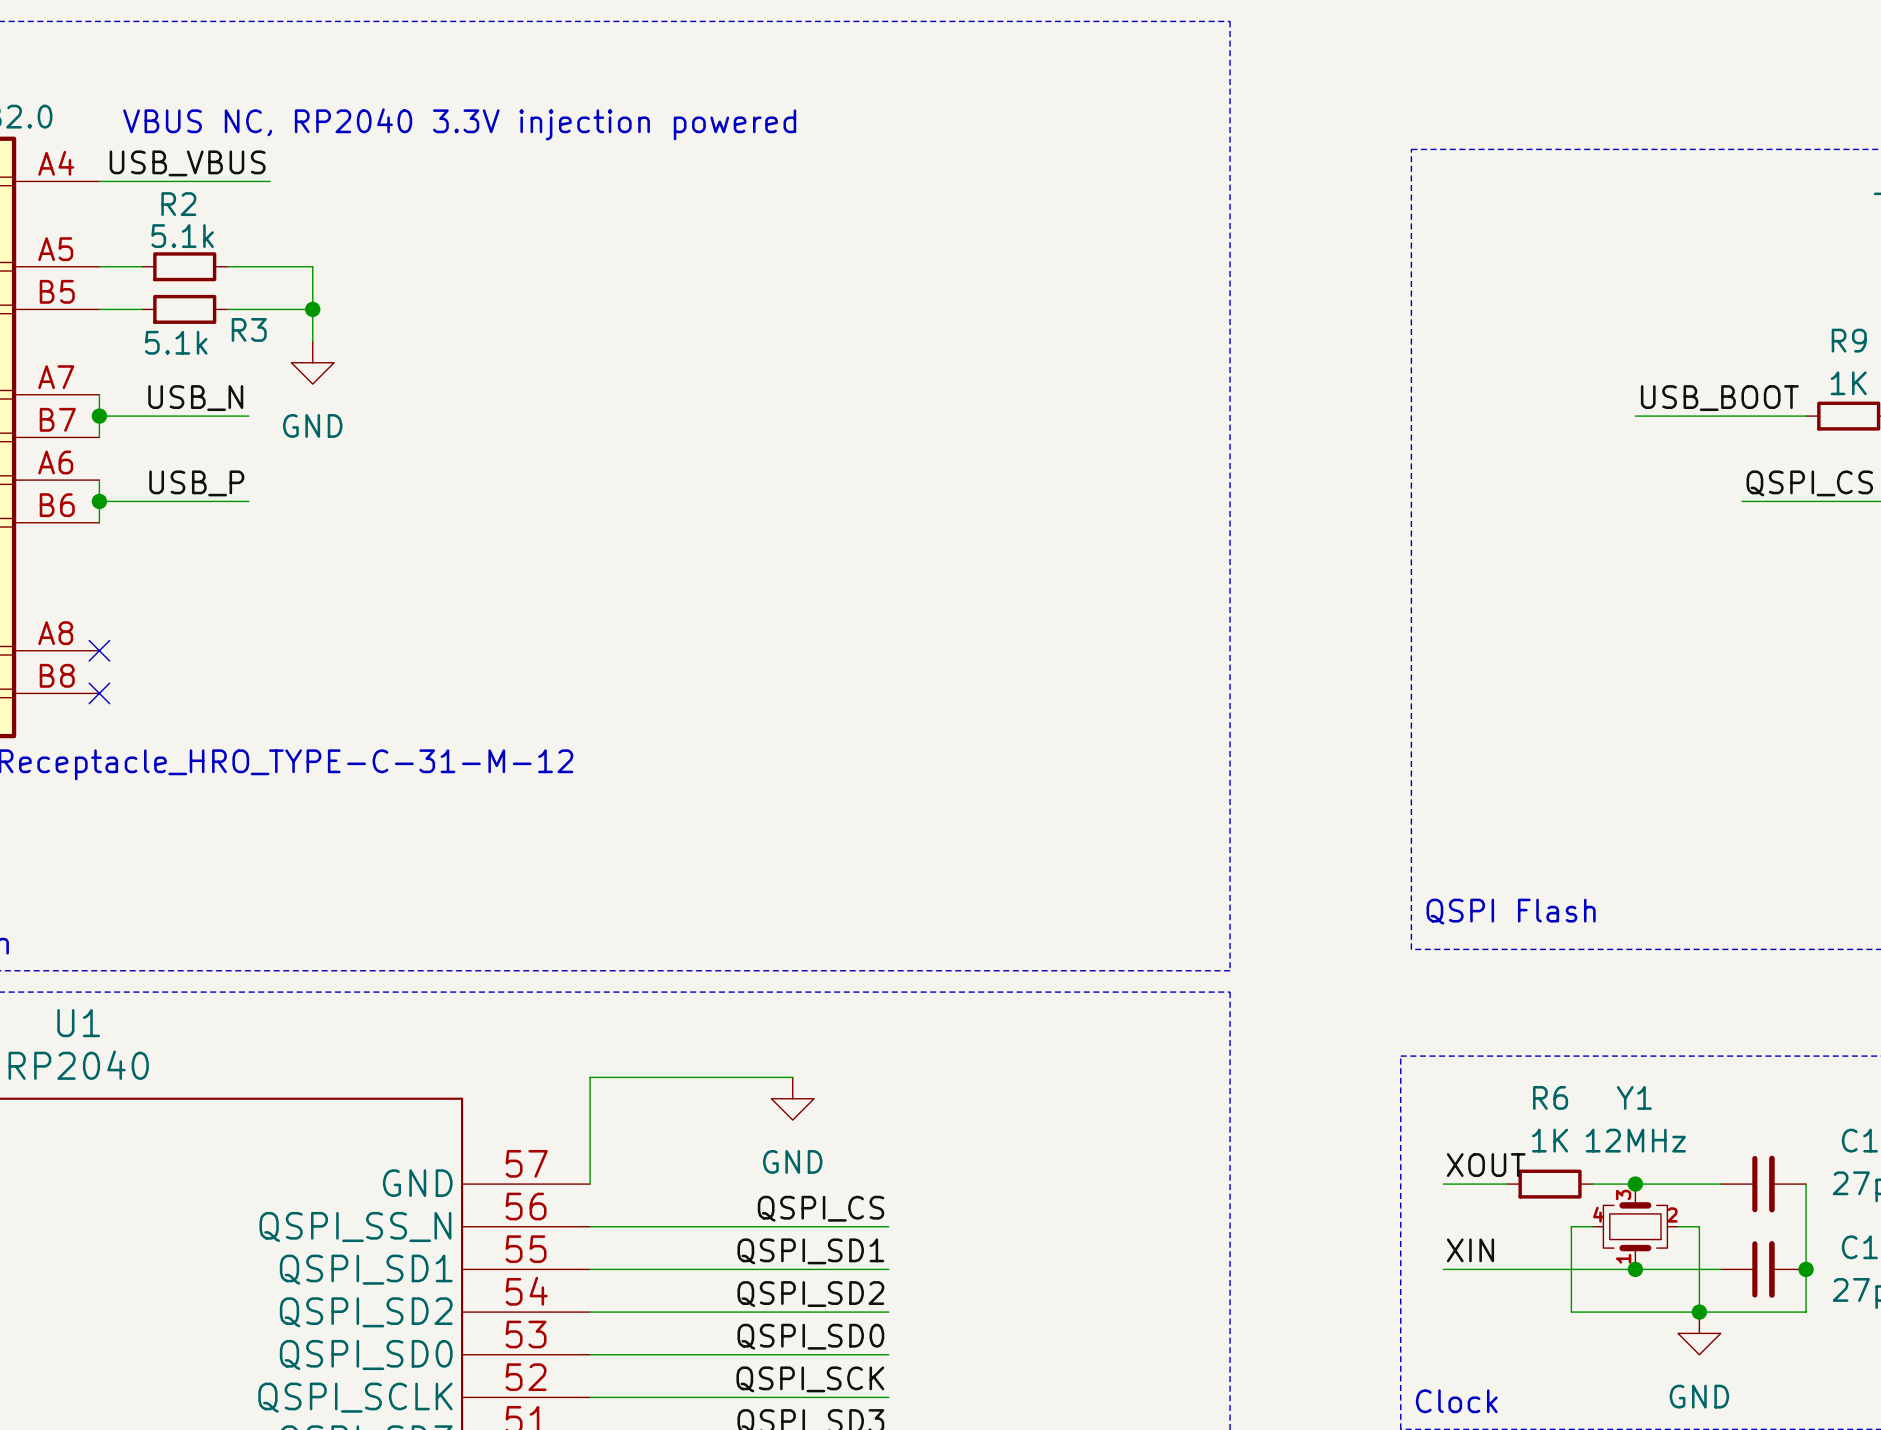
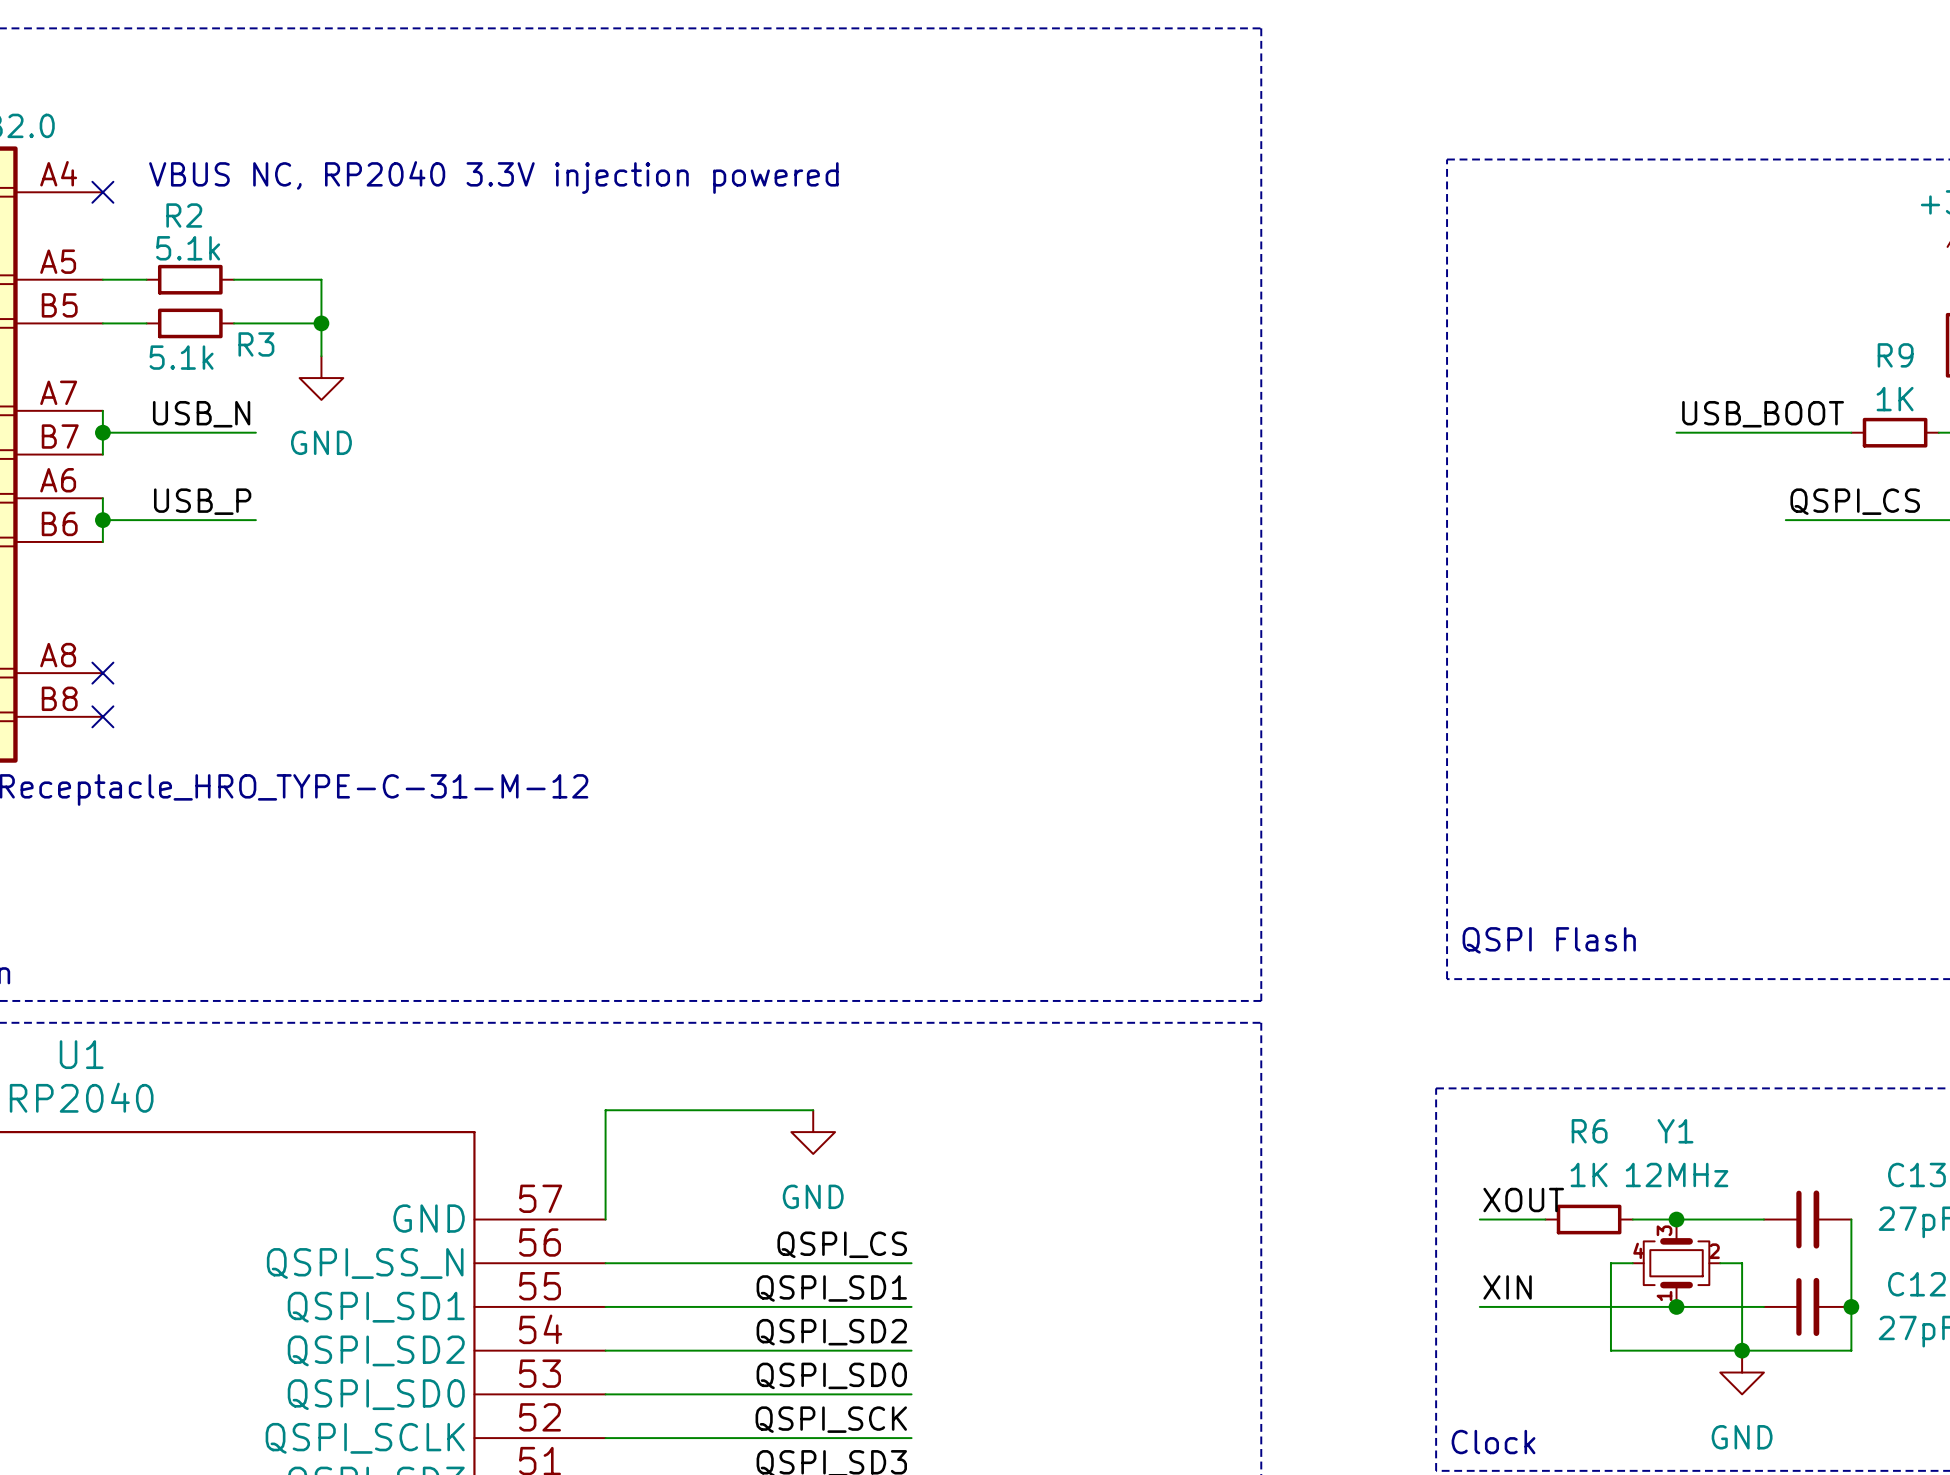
text position: VBUS NC, RP2040 3.3V injection powered (459, 124) -> VBUS NC, RP2040 3.3V injection powered (493, 177)
label: USB_VBUS (187, 163) -> none
wire: (99, 181) (270, 181) -> none
no-connect mark: none -> (102, 192)

